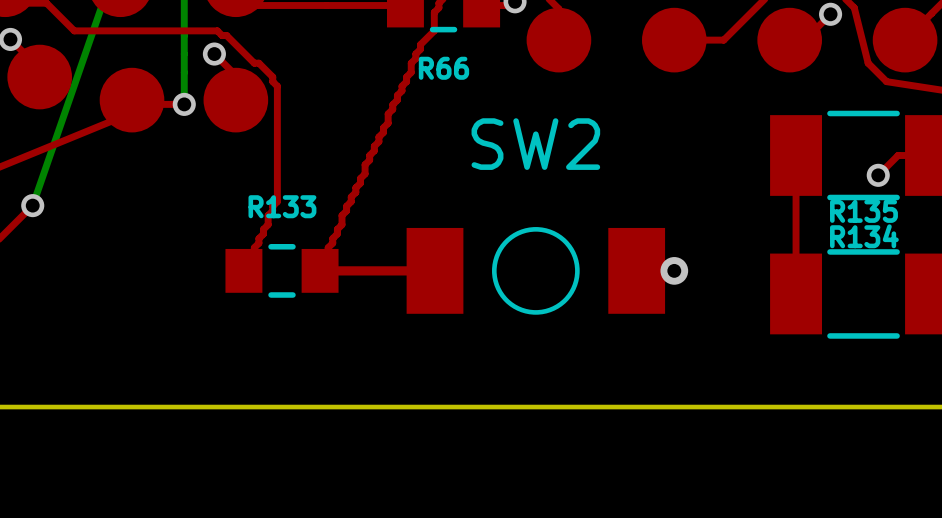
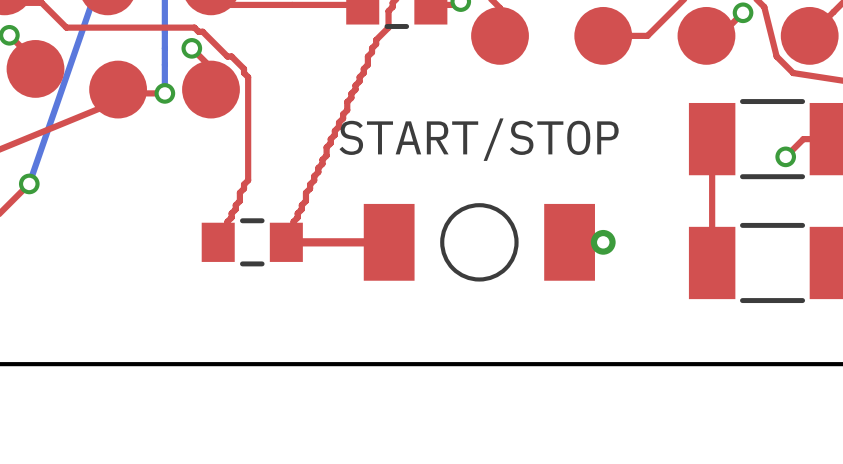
R66 name: R66 (443, 68) -> none
SW2 name: SW2 (535, 144) -> none
text: none -> START/STOP (479, 139)
R133 name: R133 (282, 206) -> none
R135 name: R135 (863, 211) -> none
R134 name: R134 (864, 236) -> none

